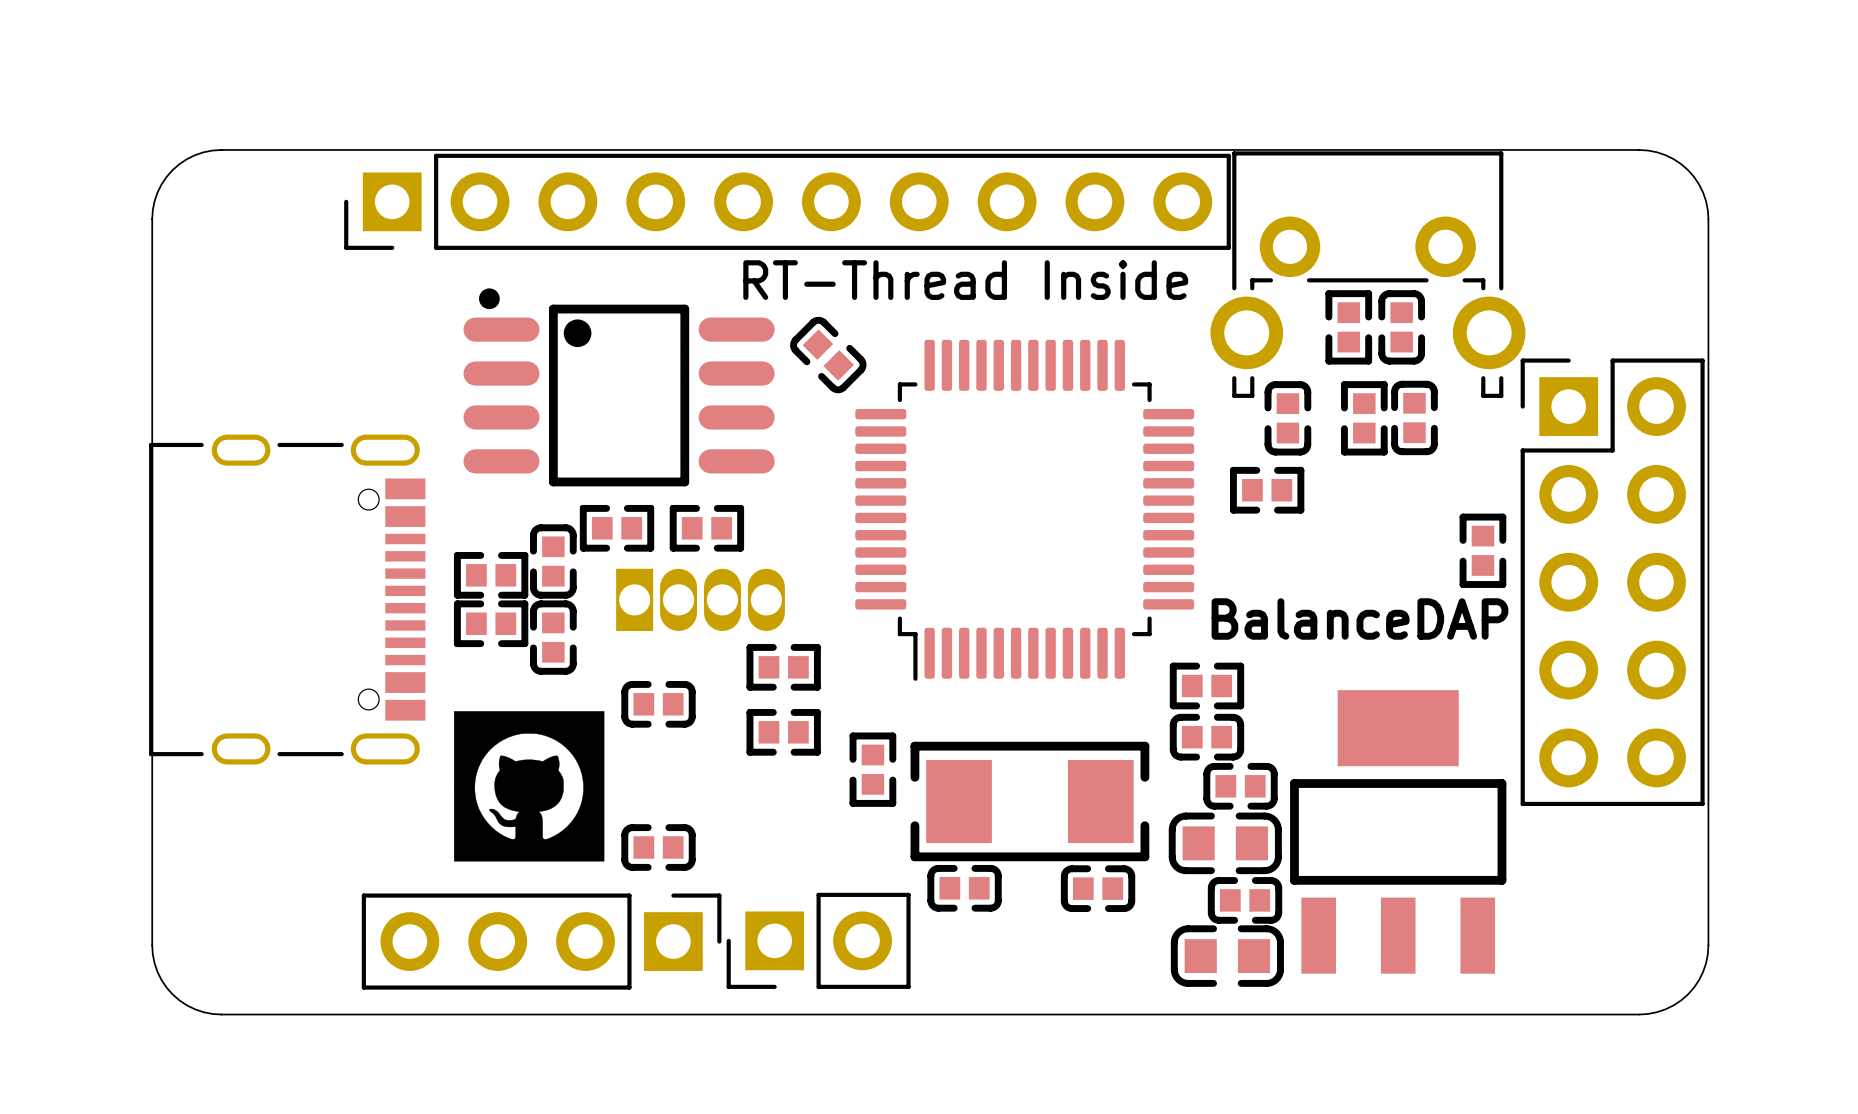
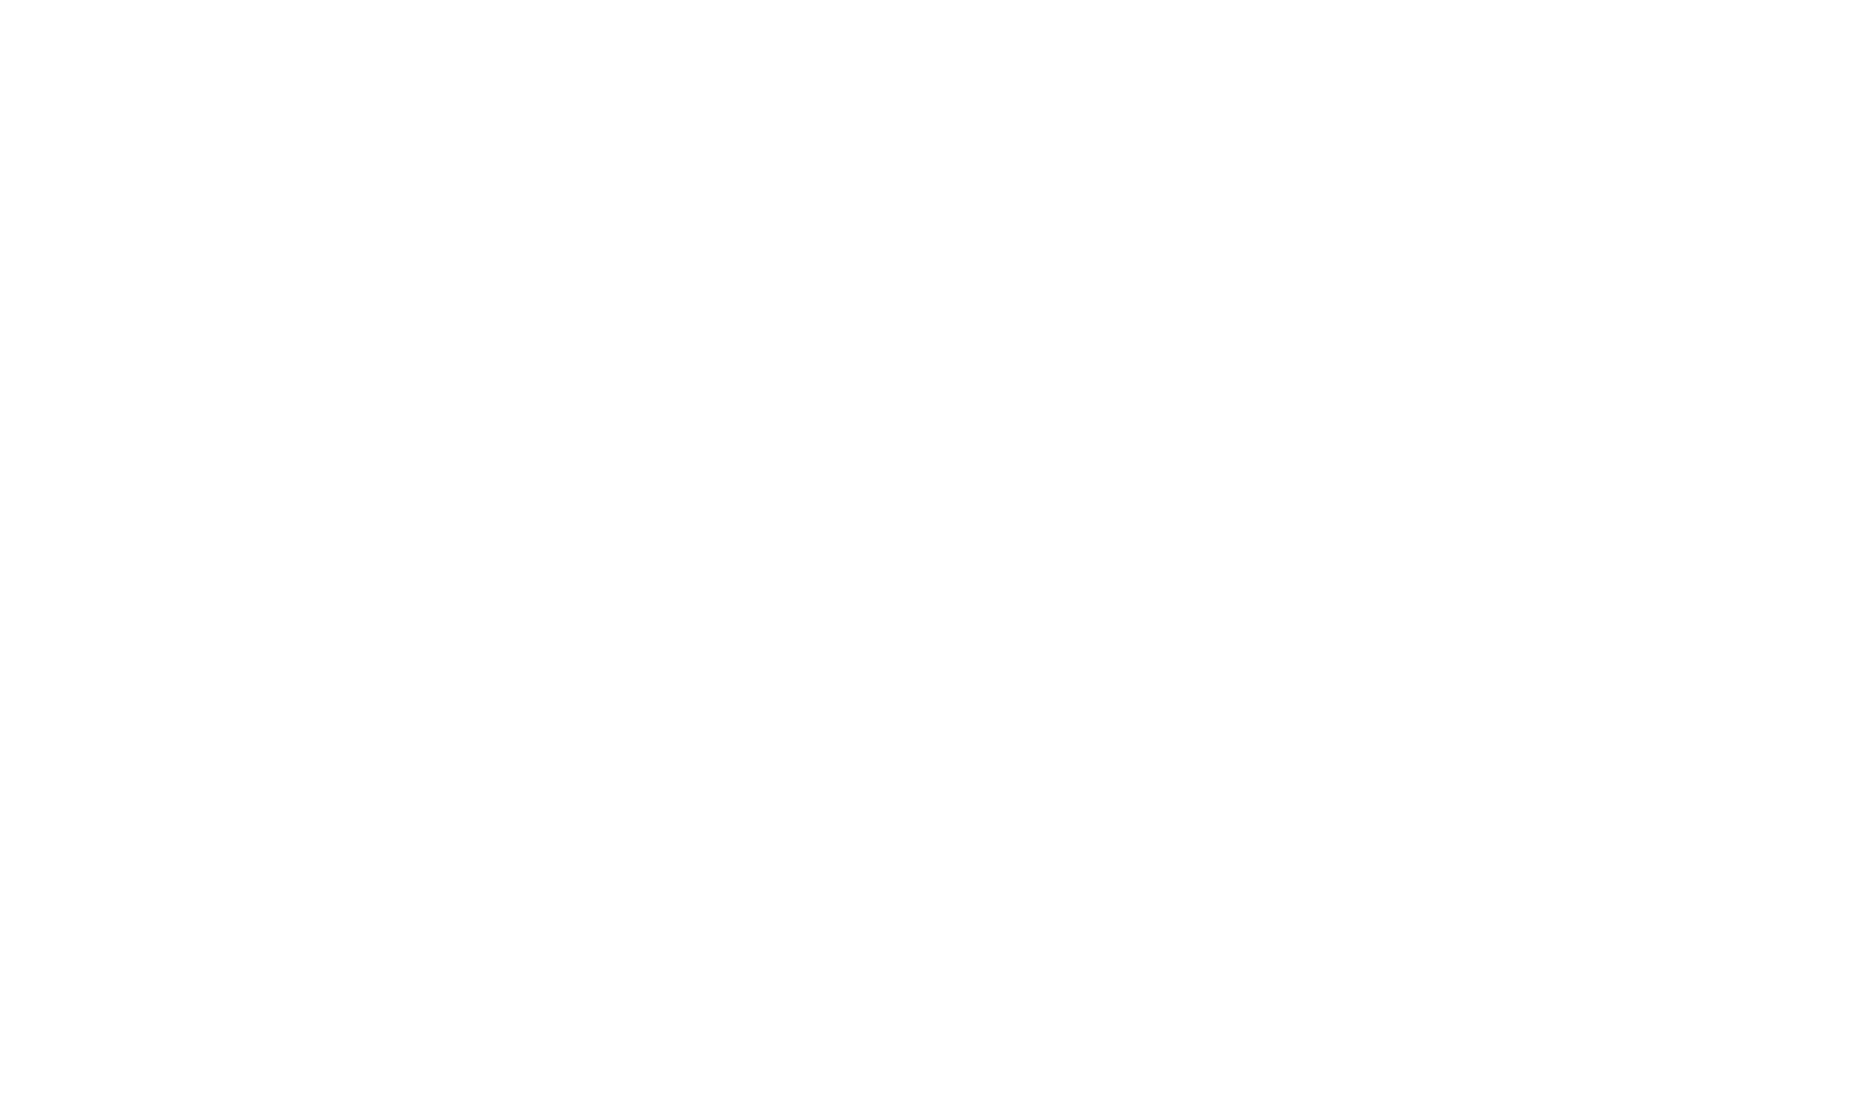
board edge: (221, 149) (1639, 149) (1657, 152) (1673, 159) (1688, 170) (1699, 184) (1706, 201) (1708, 219) (1708, 945) (1706, 963) (1699, 979) (1688, 994) (1673, 1005) (1657, 1012) (1639, 1014) (221, 1014) (203, 1012) (186, 1005) (172, 994) (161, 979) (154, 963) (152, 945) (152, 219) (157, 192) (172, 170) (194, 155) (221, 149) -> none
part: (787, 201) -> none
part: (1367, 274) -> none
text: RT-Thread Inside (965, 280) -> none
part: (1348, 327) -> none
part: (1401, 327) -> none
part: (828, 355) -> none
part: (619, 387) -> none
part: (1414, 417) -> none
part: (1287, 418) -> none
part: (1364, 418) -> none
part: (1267, 490) -> none
part: (1024, 510) -> none
part: (617, 528) -> none
part: (706, 528) -> none
part: (1482, 550) -> none
part: (553, 561) -> none
part: (491, 575) -> none
part: (1612, 582) -> none
part: (287, 599) -> none
part: (700, 599) -> none
text: BalanceDAP (1359, 618) -> none
part: (491, 623) -> none
part: (553, 637) -> none
part: (783, 667) -> none
part: (1206, 685) -> none
part: (658, 704) -> none
drawing: [454, 711, 605, 862] -> none
part: (783, 732) -> none
part: (1206, 737) -> none
part: (872, 769) -> none
part: (1240, 786) -> none
part: (1029, 801) -> none
part: (1398, 831) -> none
part: (1225, 843) -> none
part: (658, 847) -> none
part: (964, 888) -> none
part: (1098, 888) -> none
part: (1245, 900) -> none
part: (818, 940) -> none
part: (541, 941) -> none
part: (1227, 956) -> none

